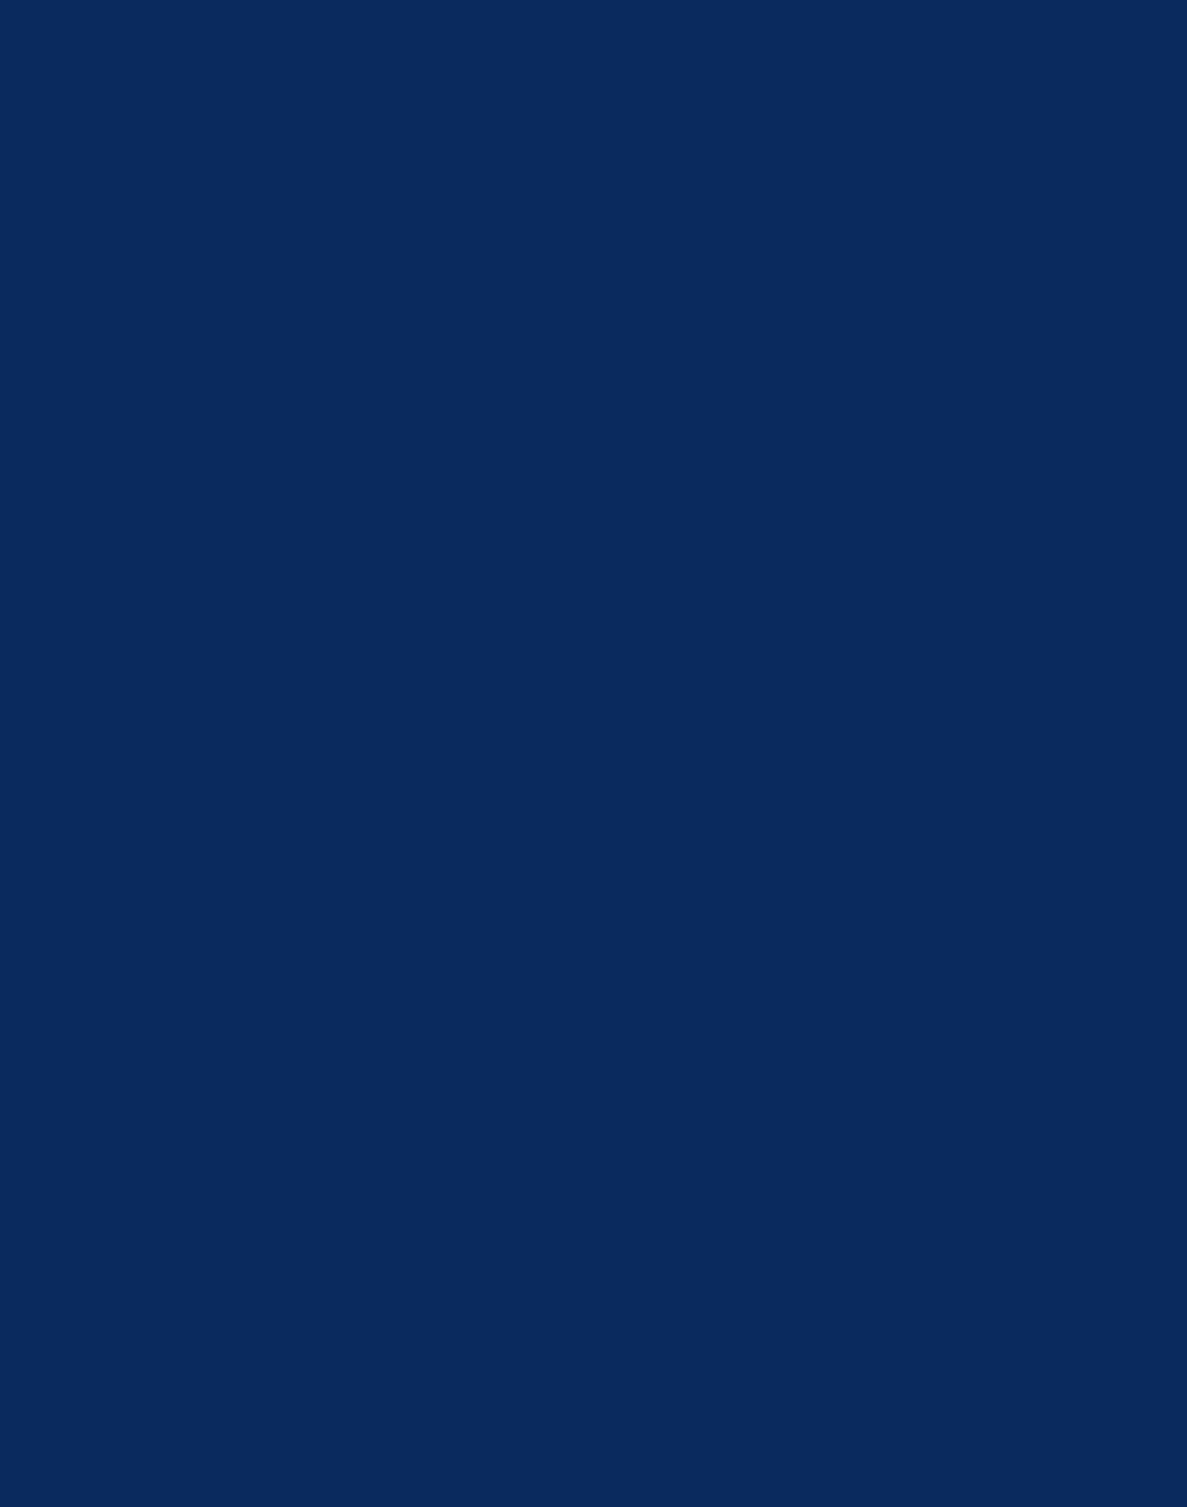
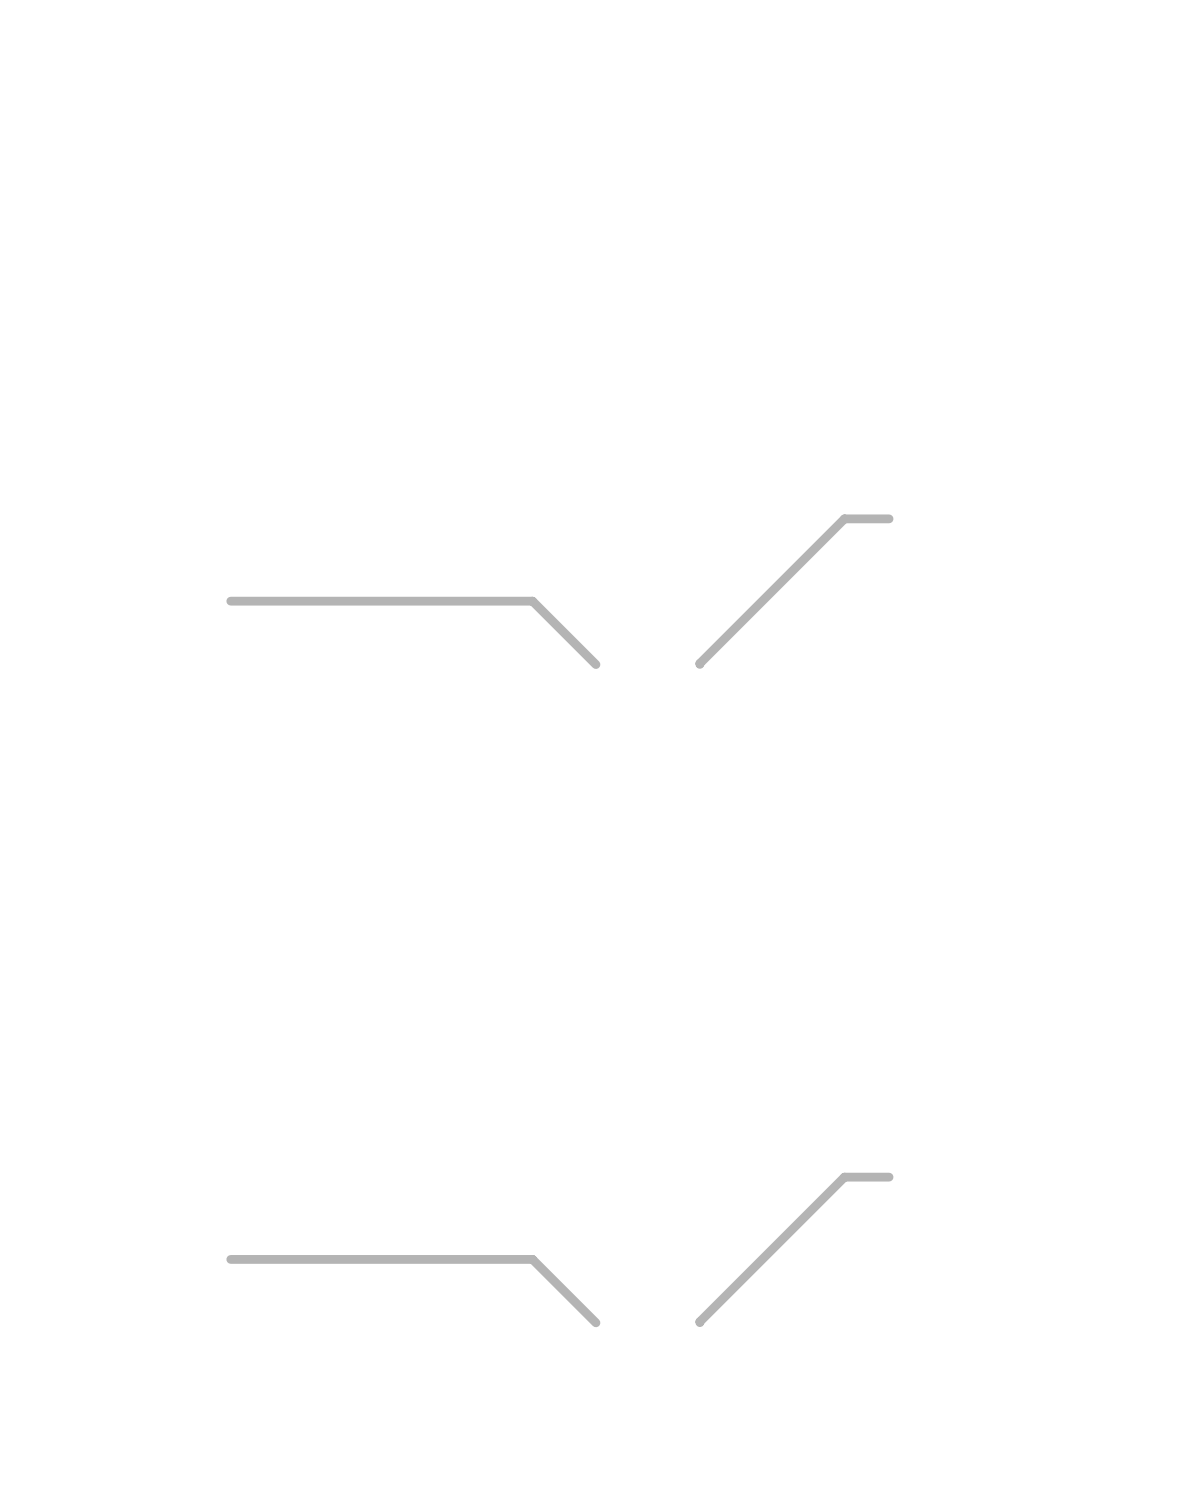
track: none -> (889, 518) (844, 518) (699, 664)
track: none -> (230, 601) (532, 601) (595, 664)
track: none -> (889, 1177) (844, 1177) (699, 1322)
track: none -> (230, 1259) (532, 1259) (595, 1322)

